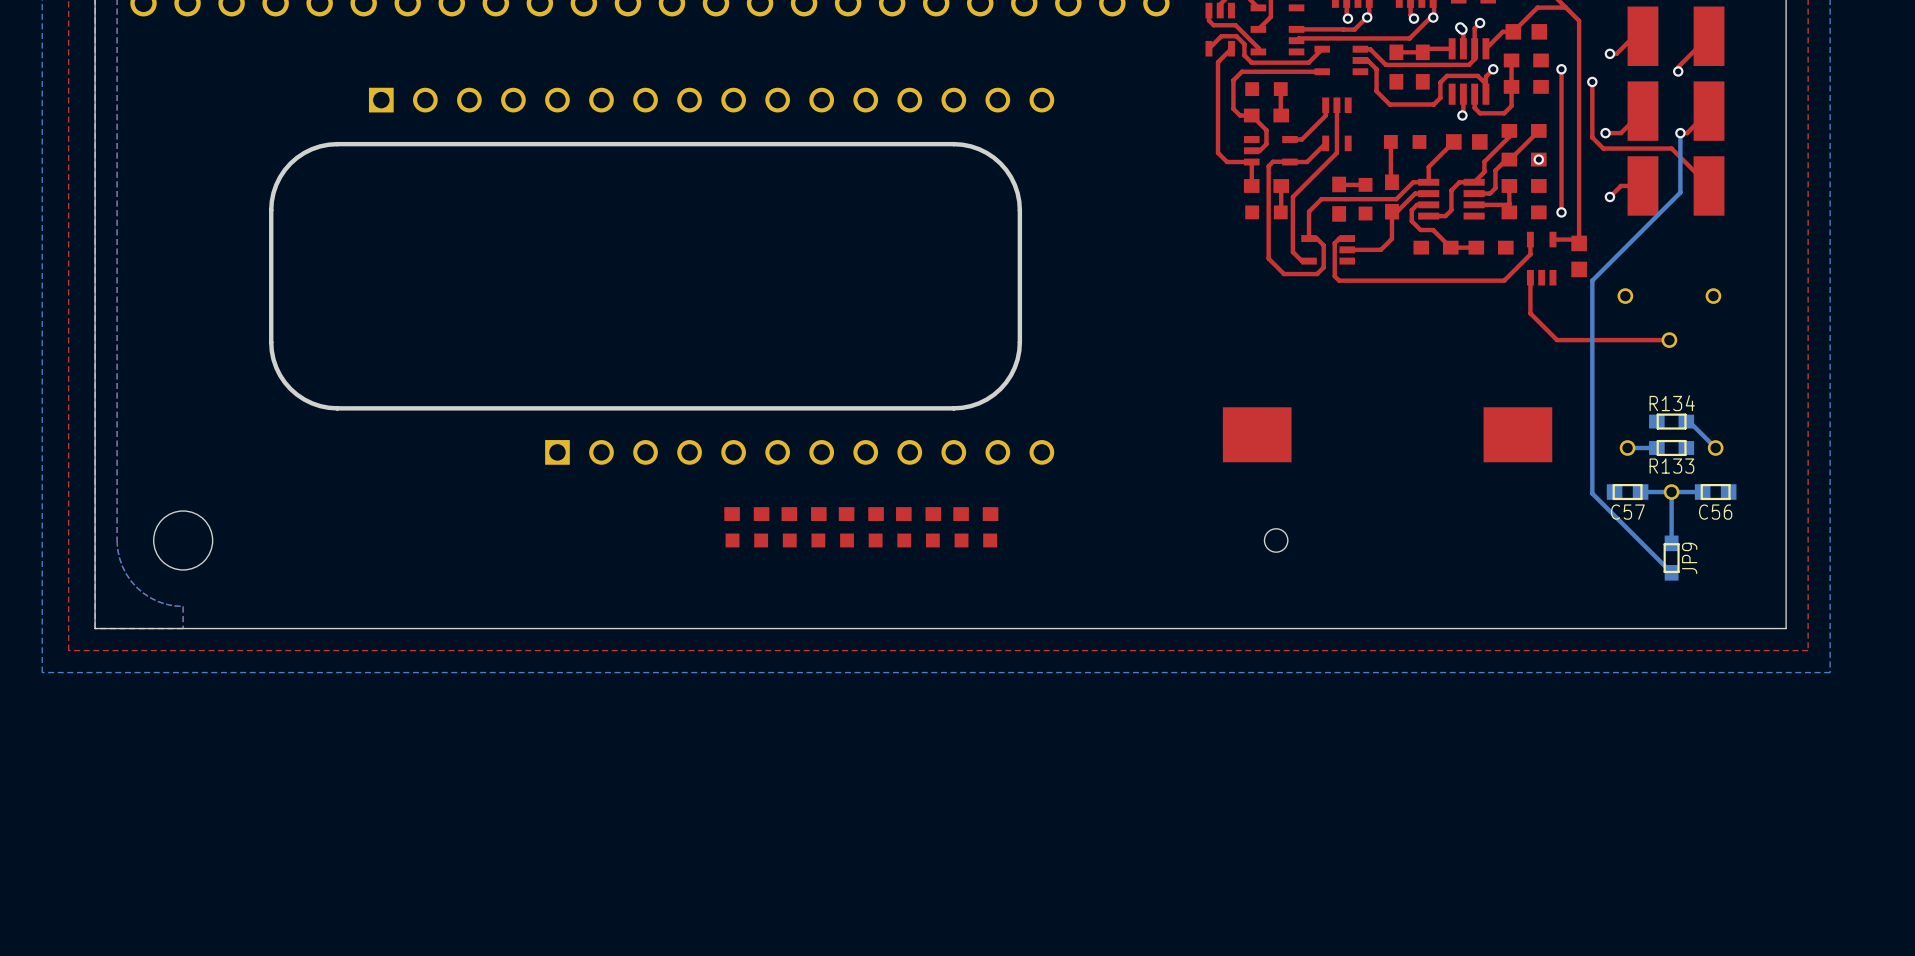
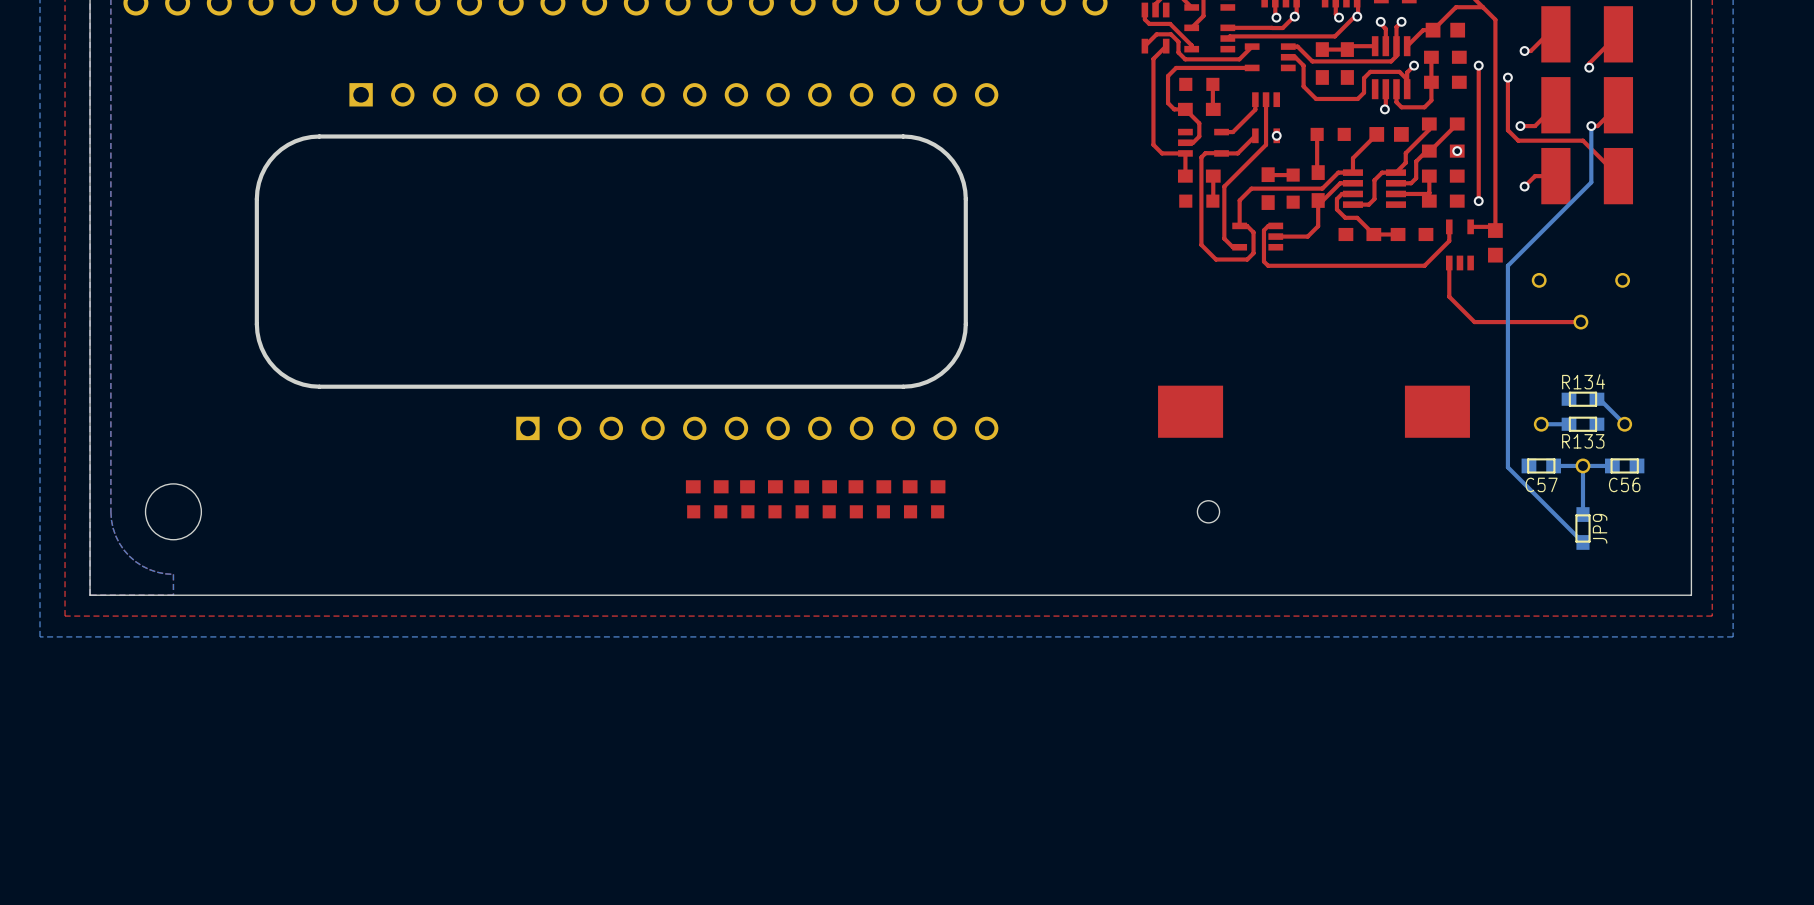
via: none -> (1380, 21)
via: (1460, 27) -> none
via: (1462, 29) -> none
via: none -> (1276, 135)

